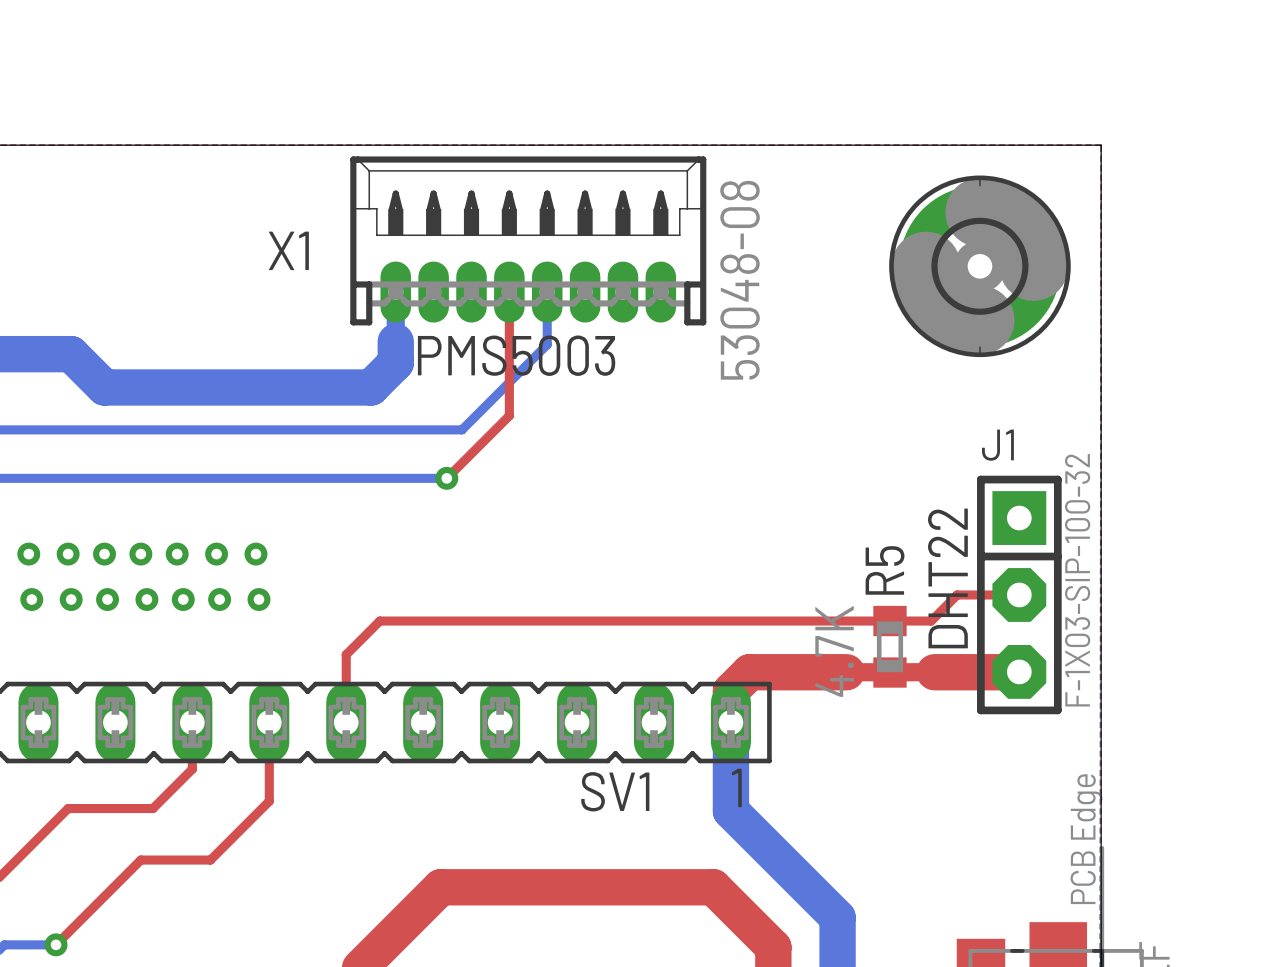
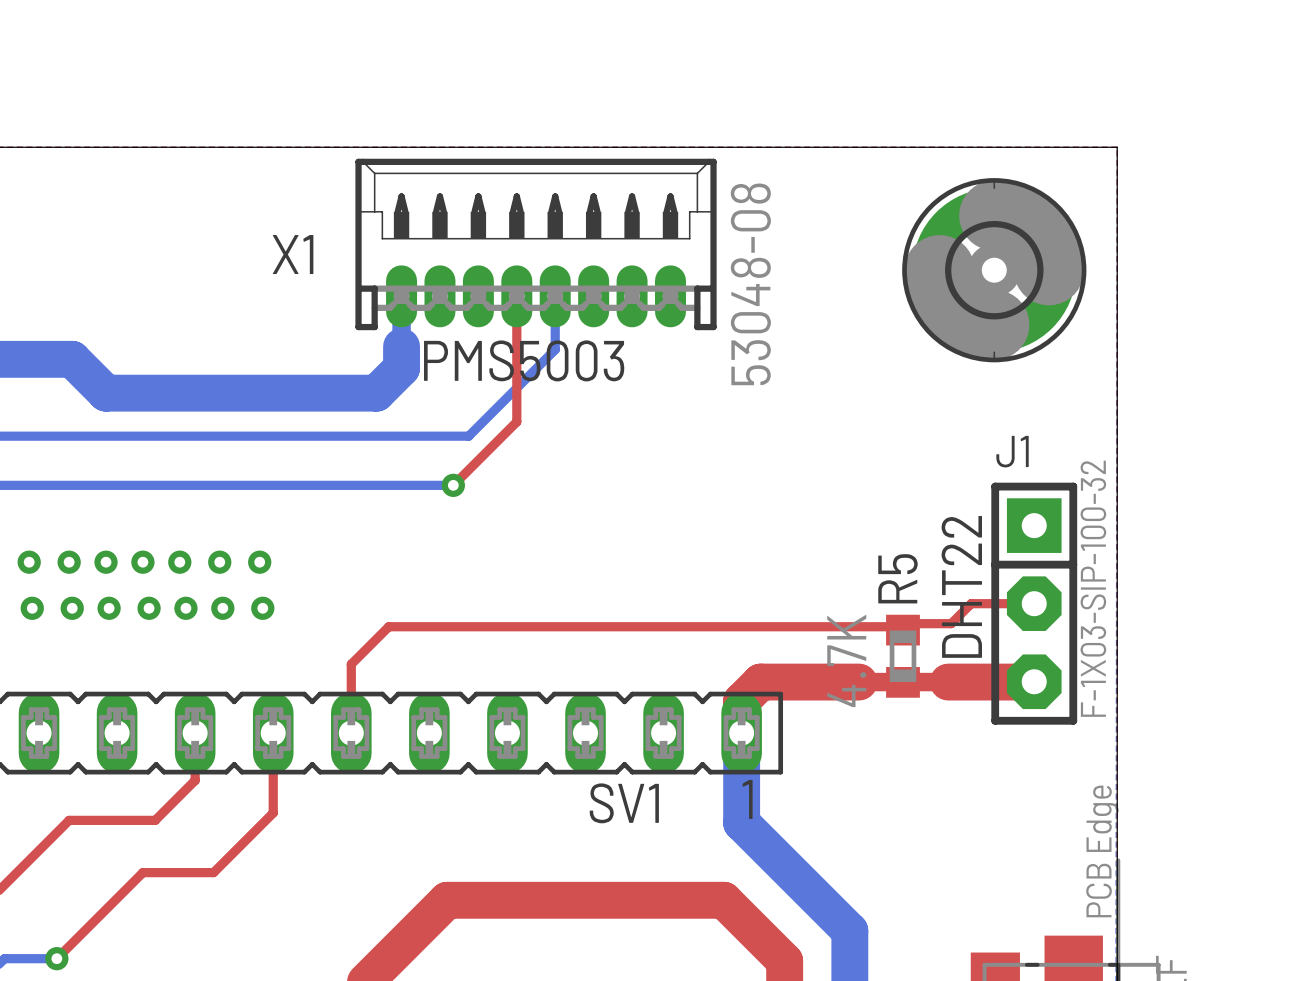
top track: (937, 614) (931, 621) (379, 621) -> (903, 630) (899, 626) (388, 626) (385, 630)
top track: none -> (951, 623) (909, 623) (903, 630)

